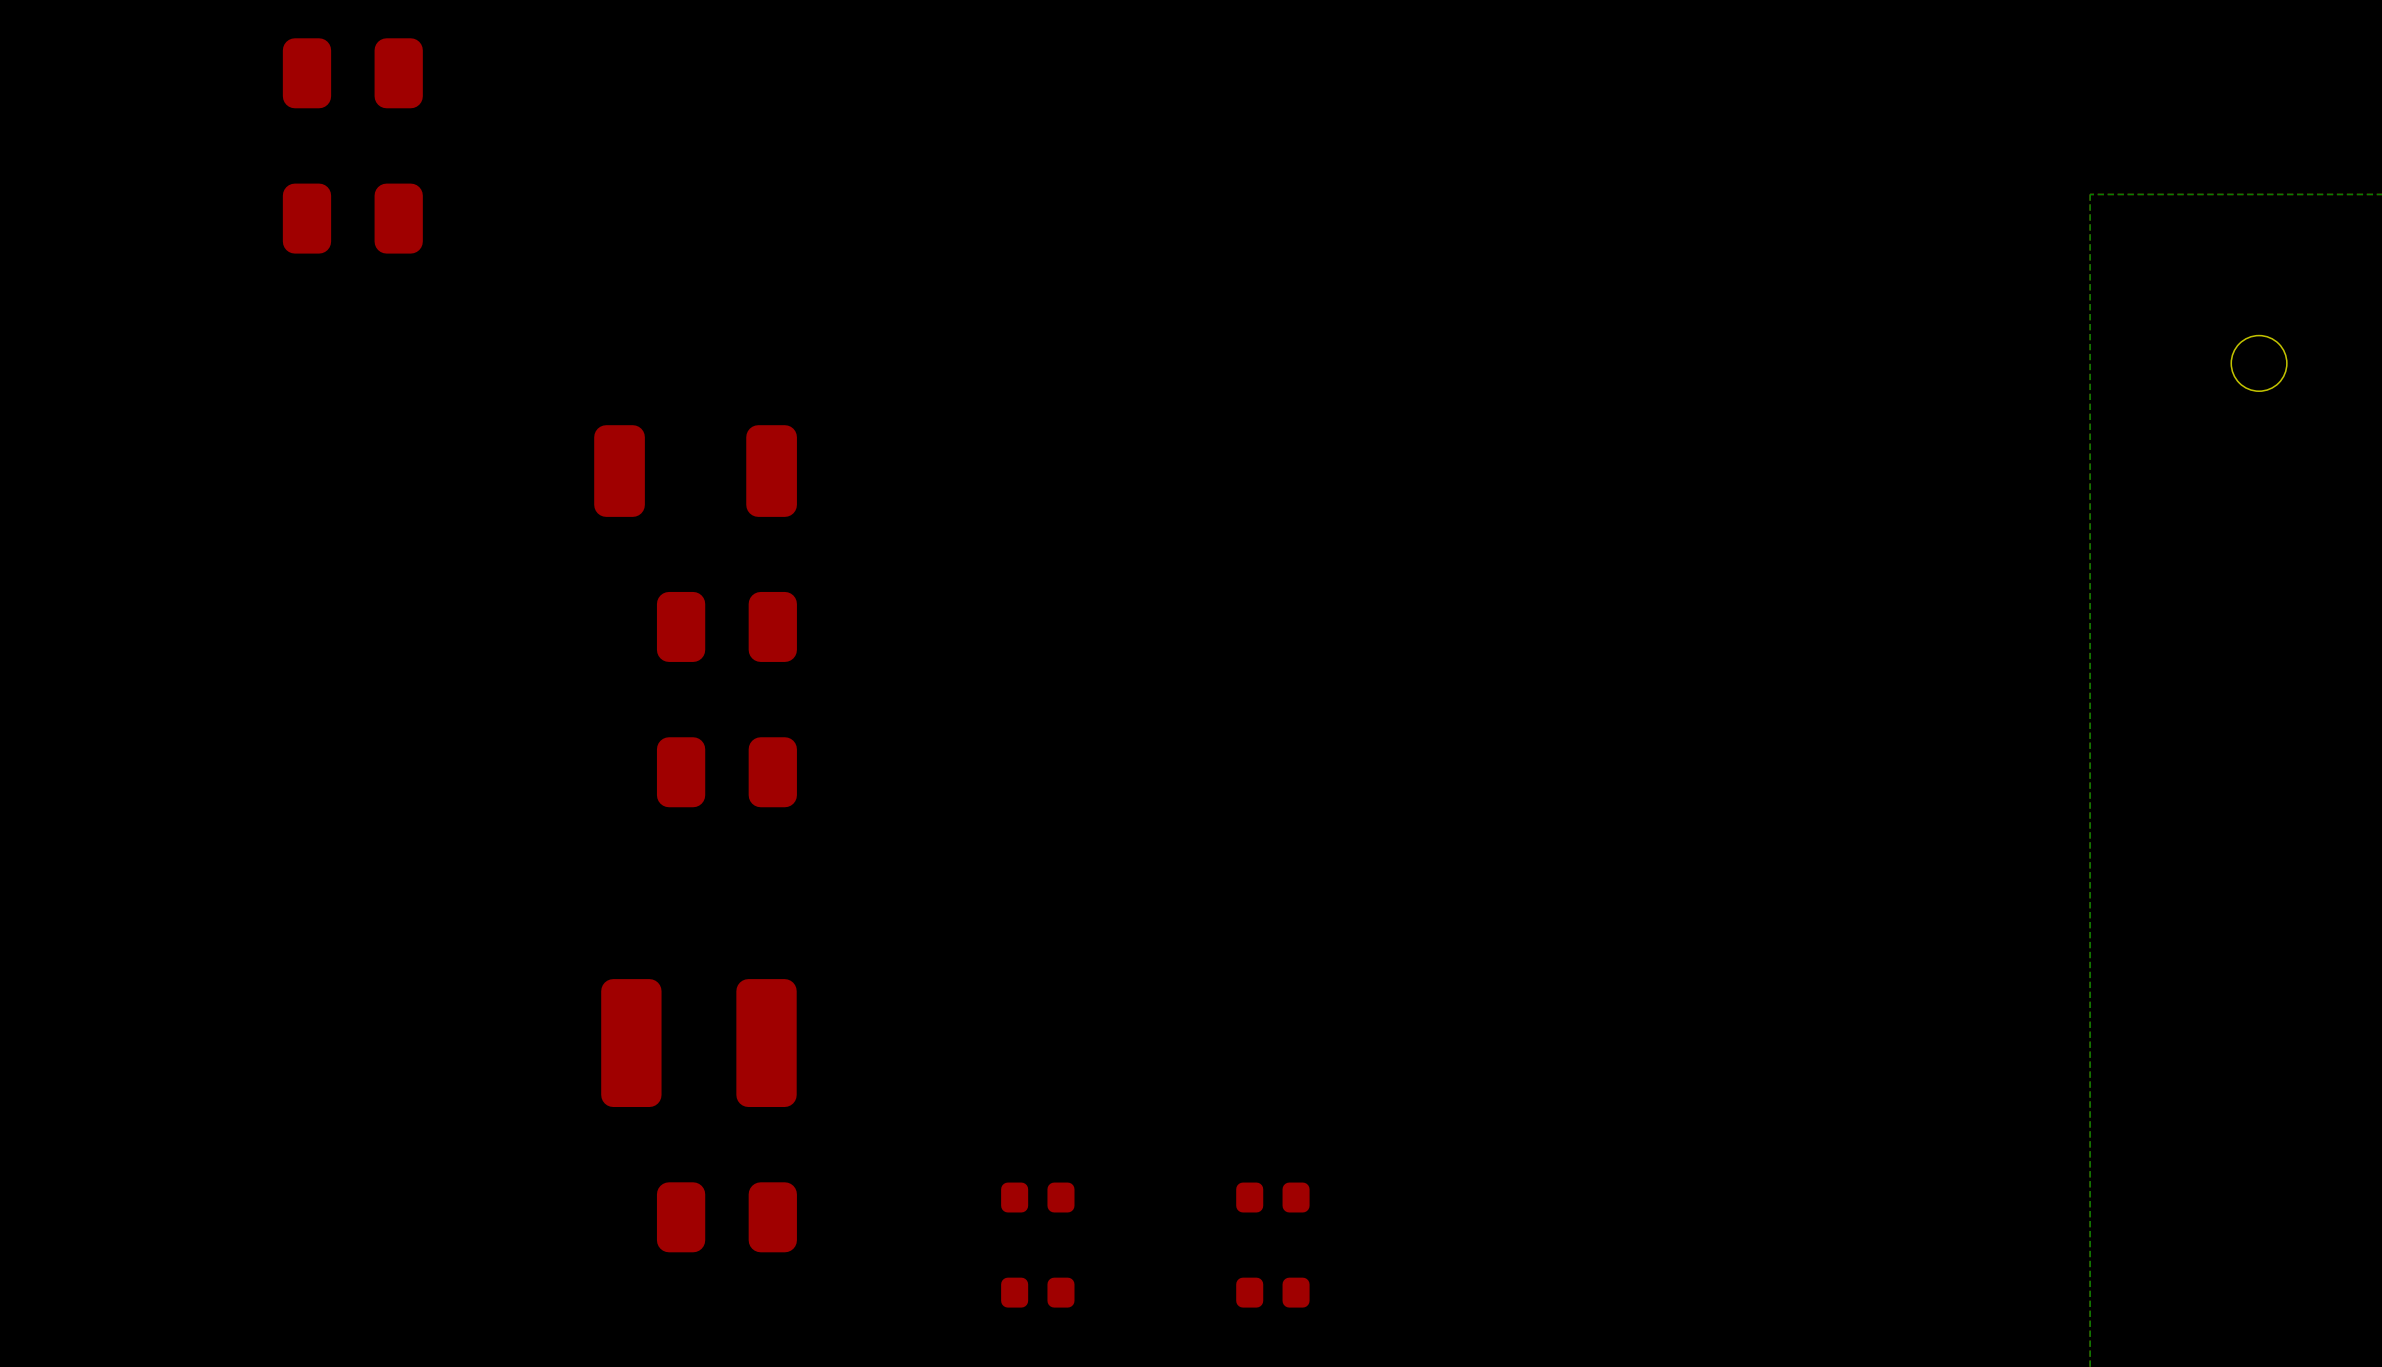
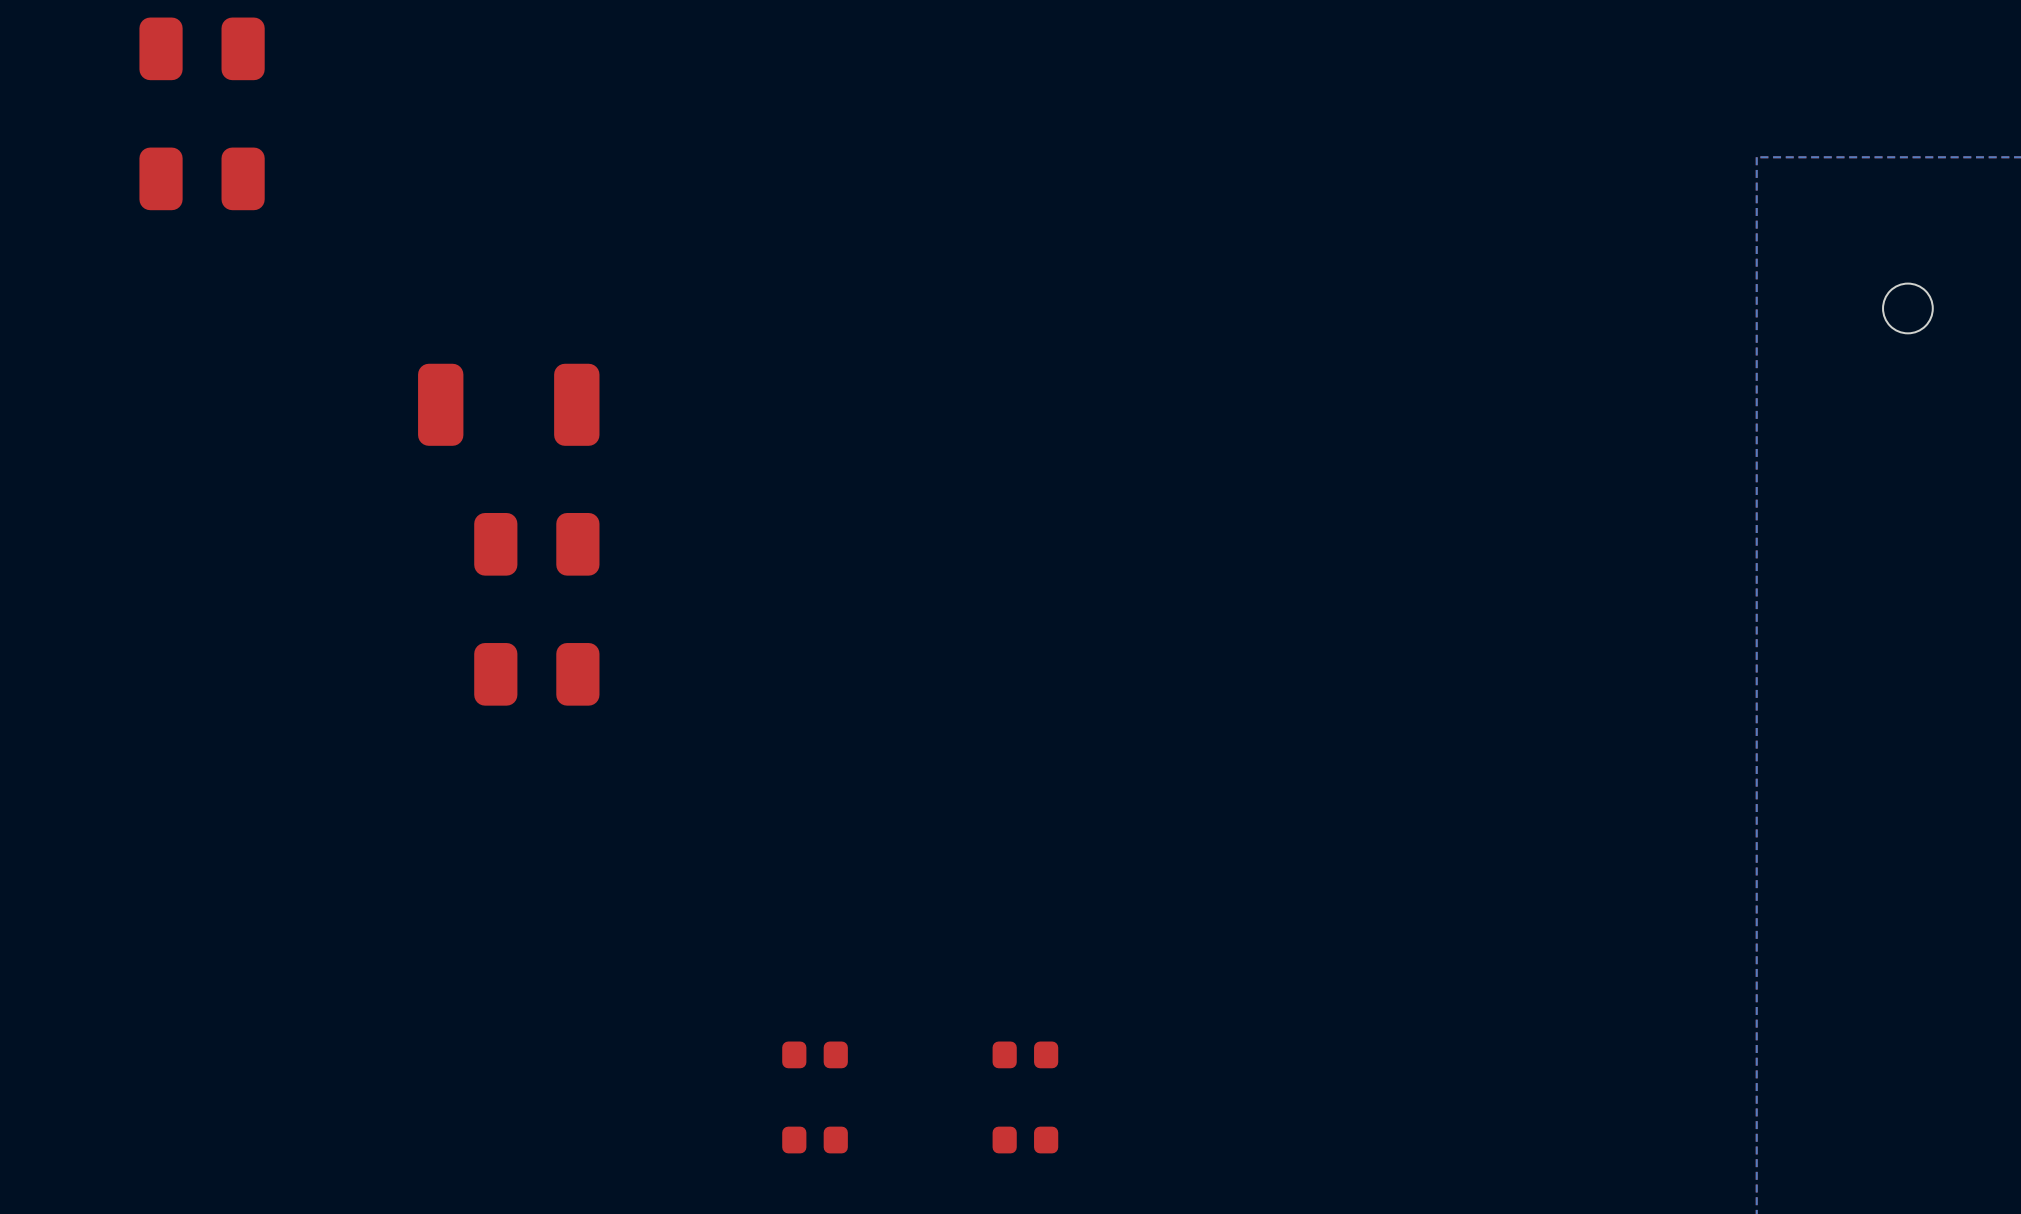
part: (698, 1043) -> none
part: (726, 1217) -> none

